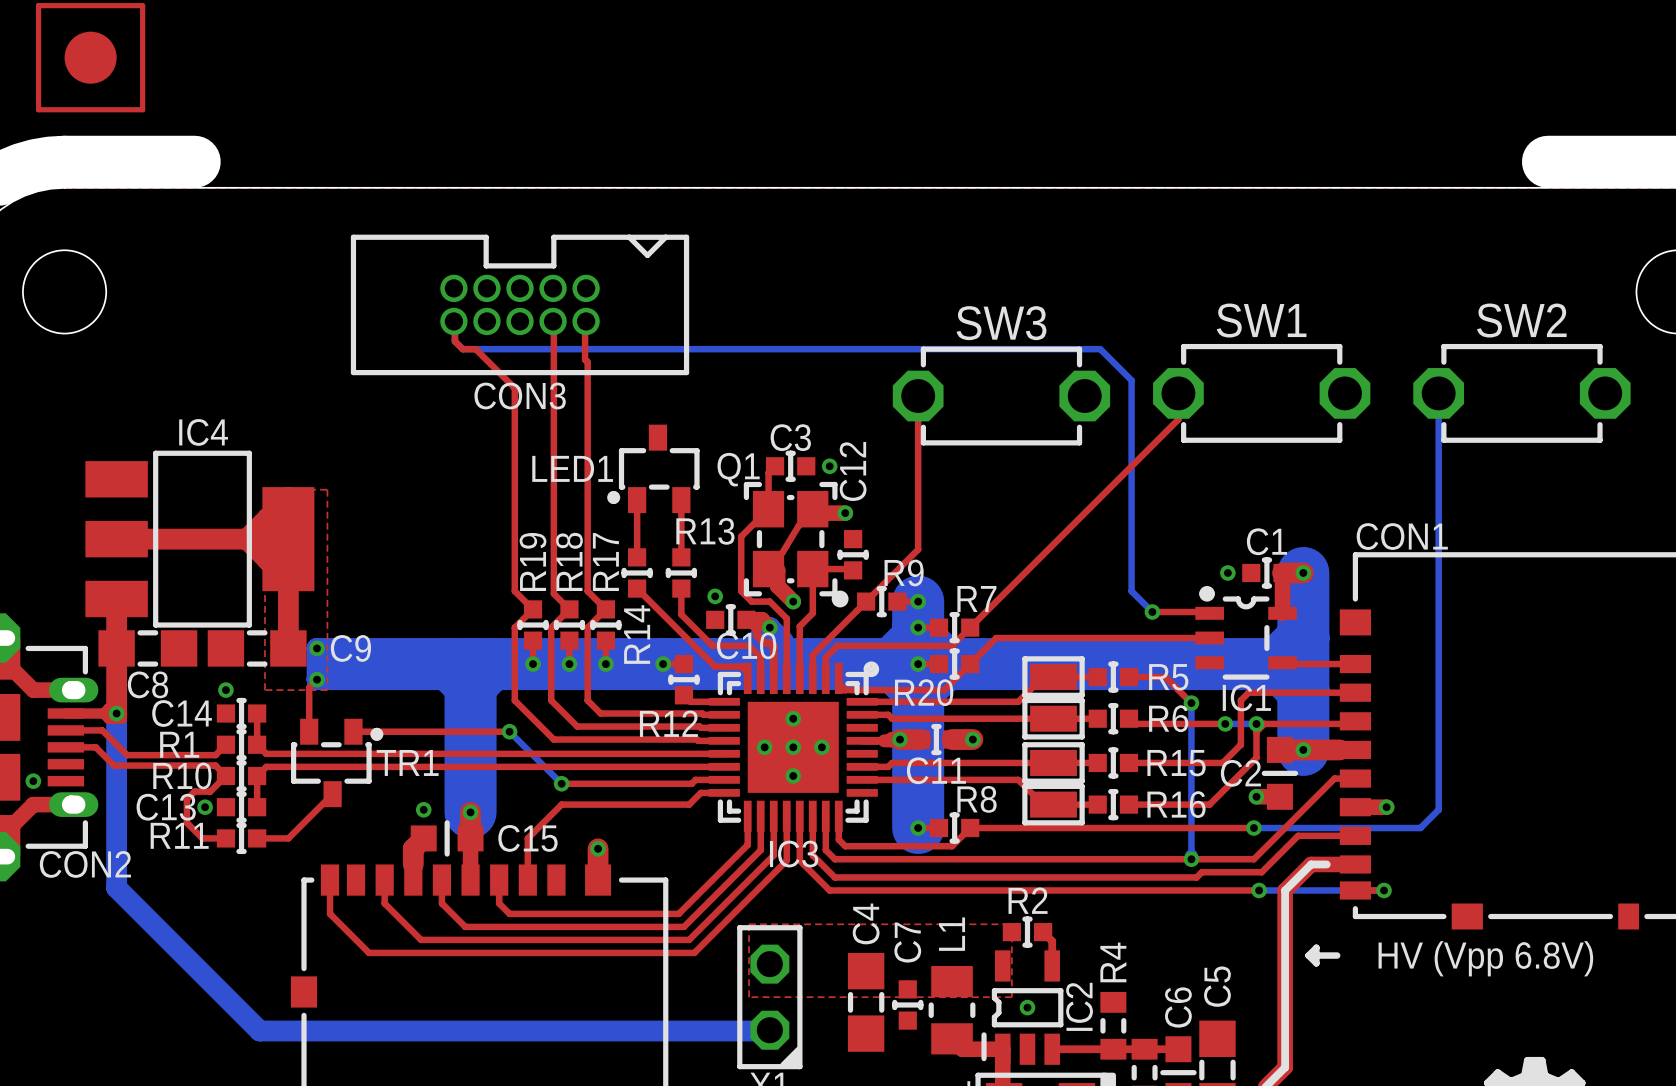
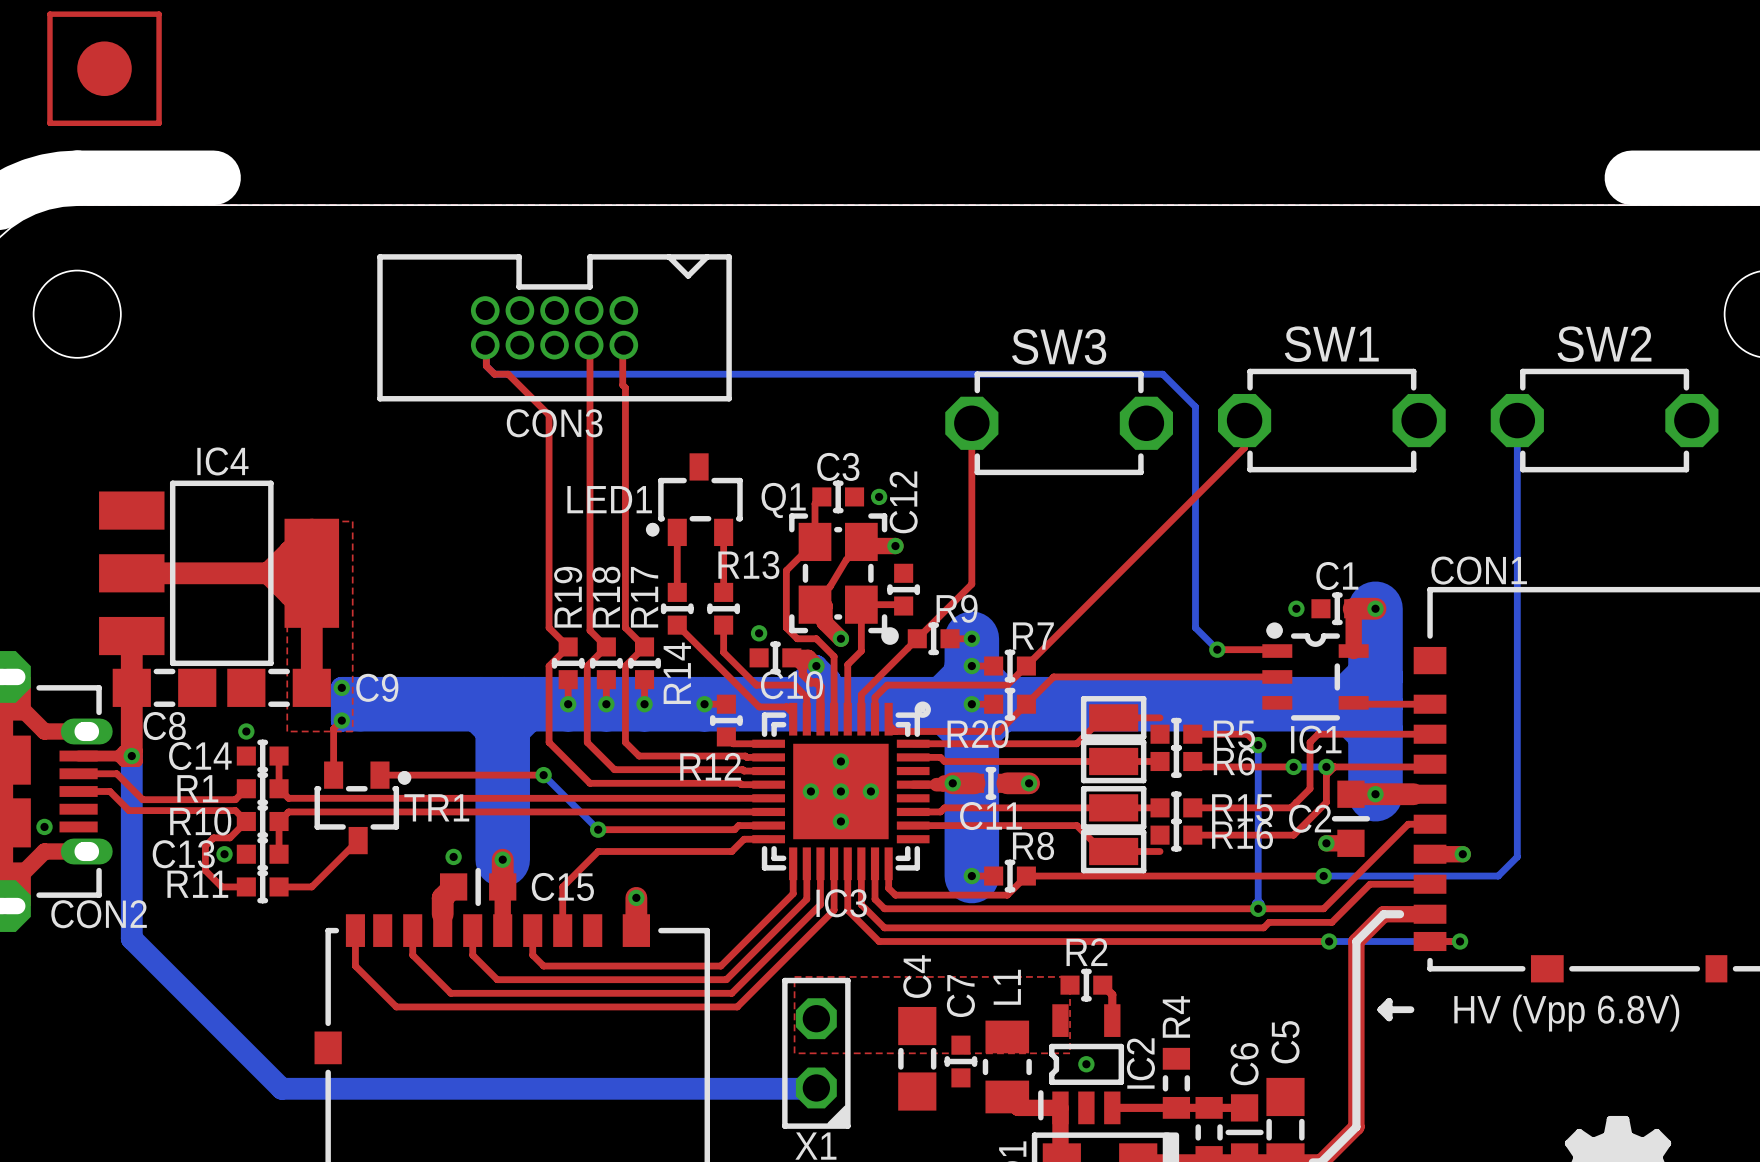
R5 position: (1113, 677) -> (1176, 734)
top track: (1128, 677) (1165, 677) (1181, 692) -> (1192, 734) (1247, 734)
top track: (1225, 788) (1209, 804) (1128, 804) -> (1293, 835) (1192, 835)
R16 position: (1113, 804) -> (1176, 835)

